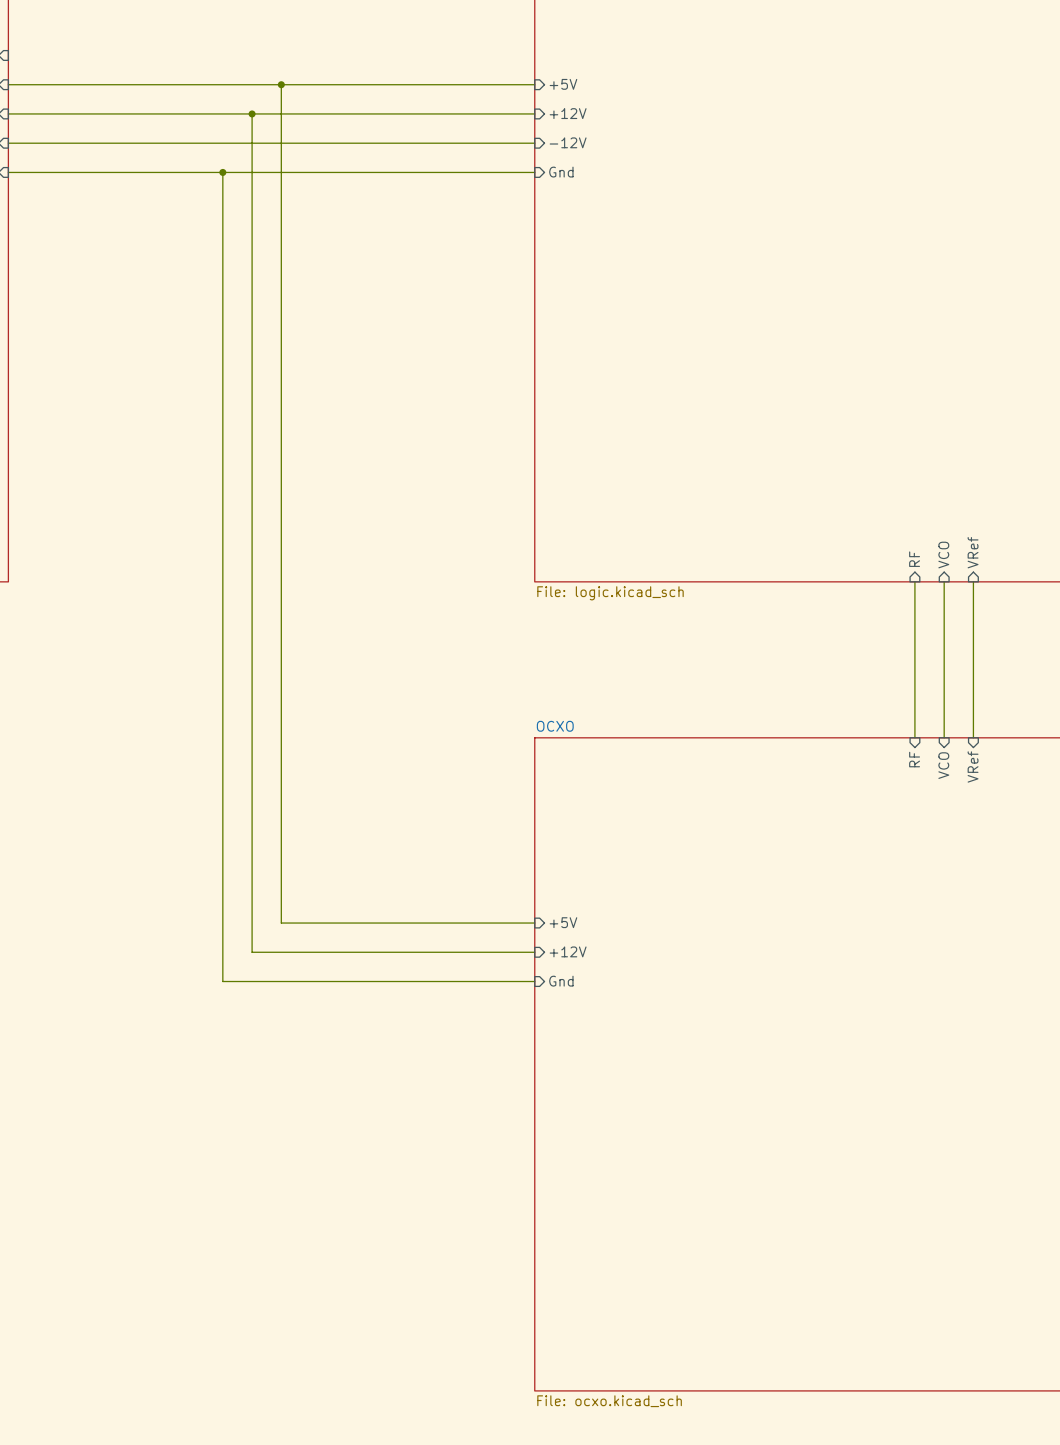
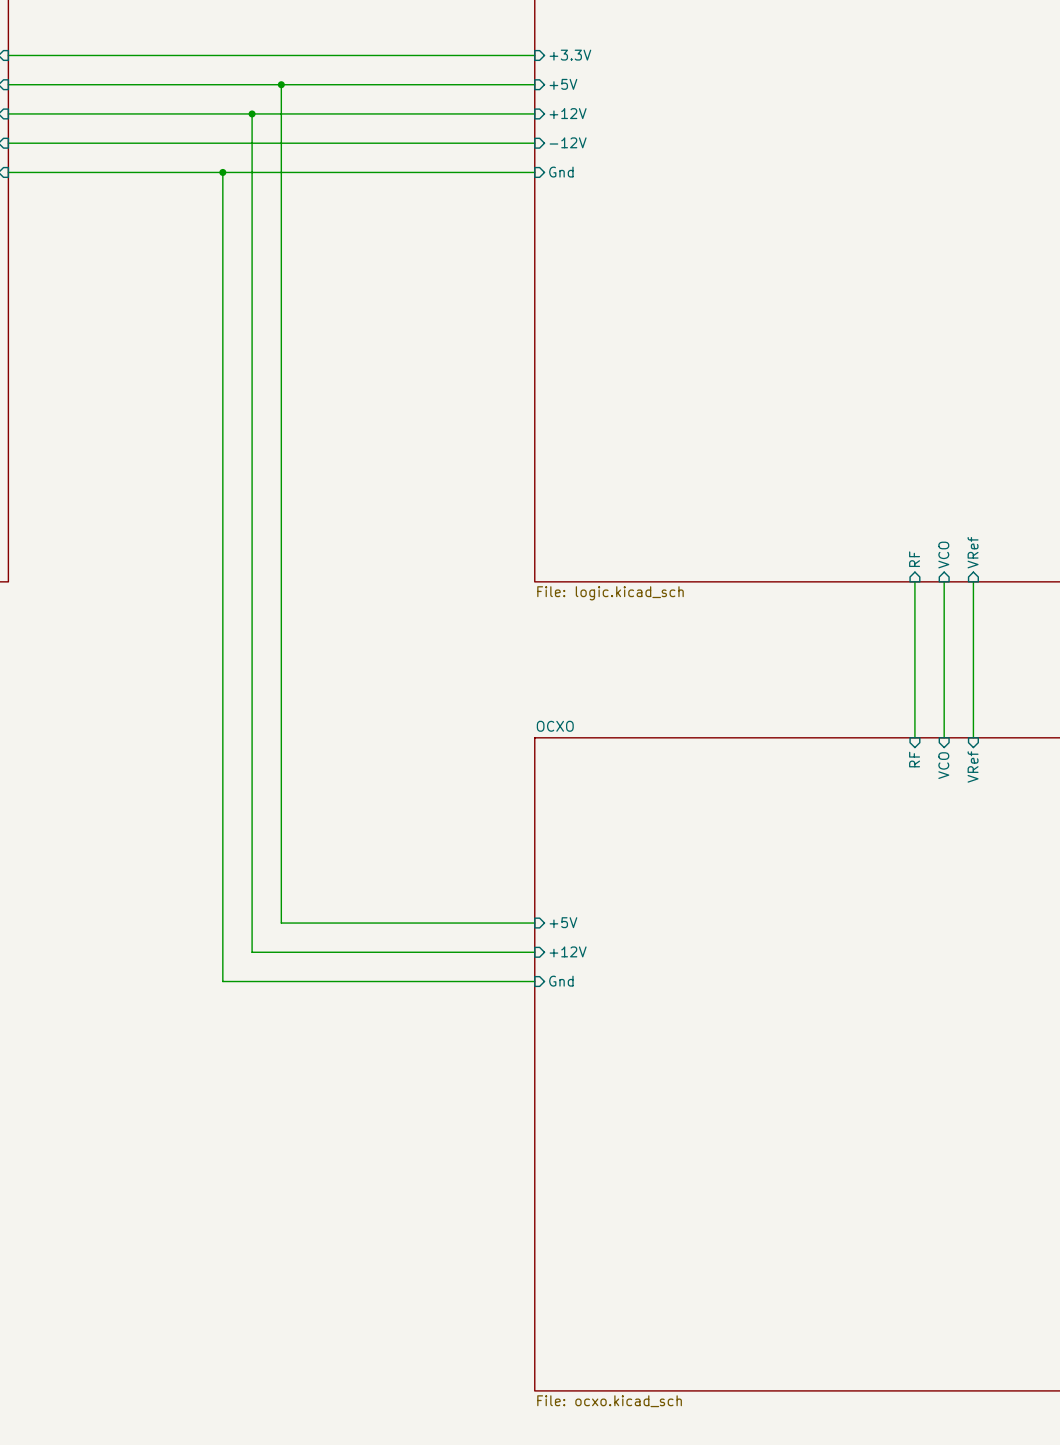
wire: none -> (8, 55) (534, 55)
sheet pin: none -> +3.3V (570, 55)

